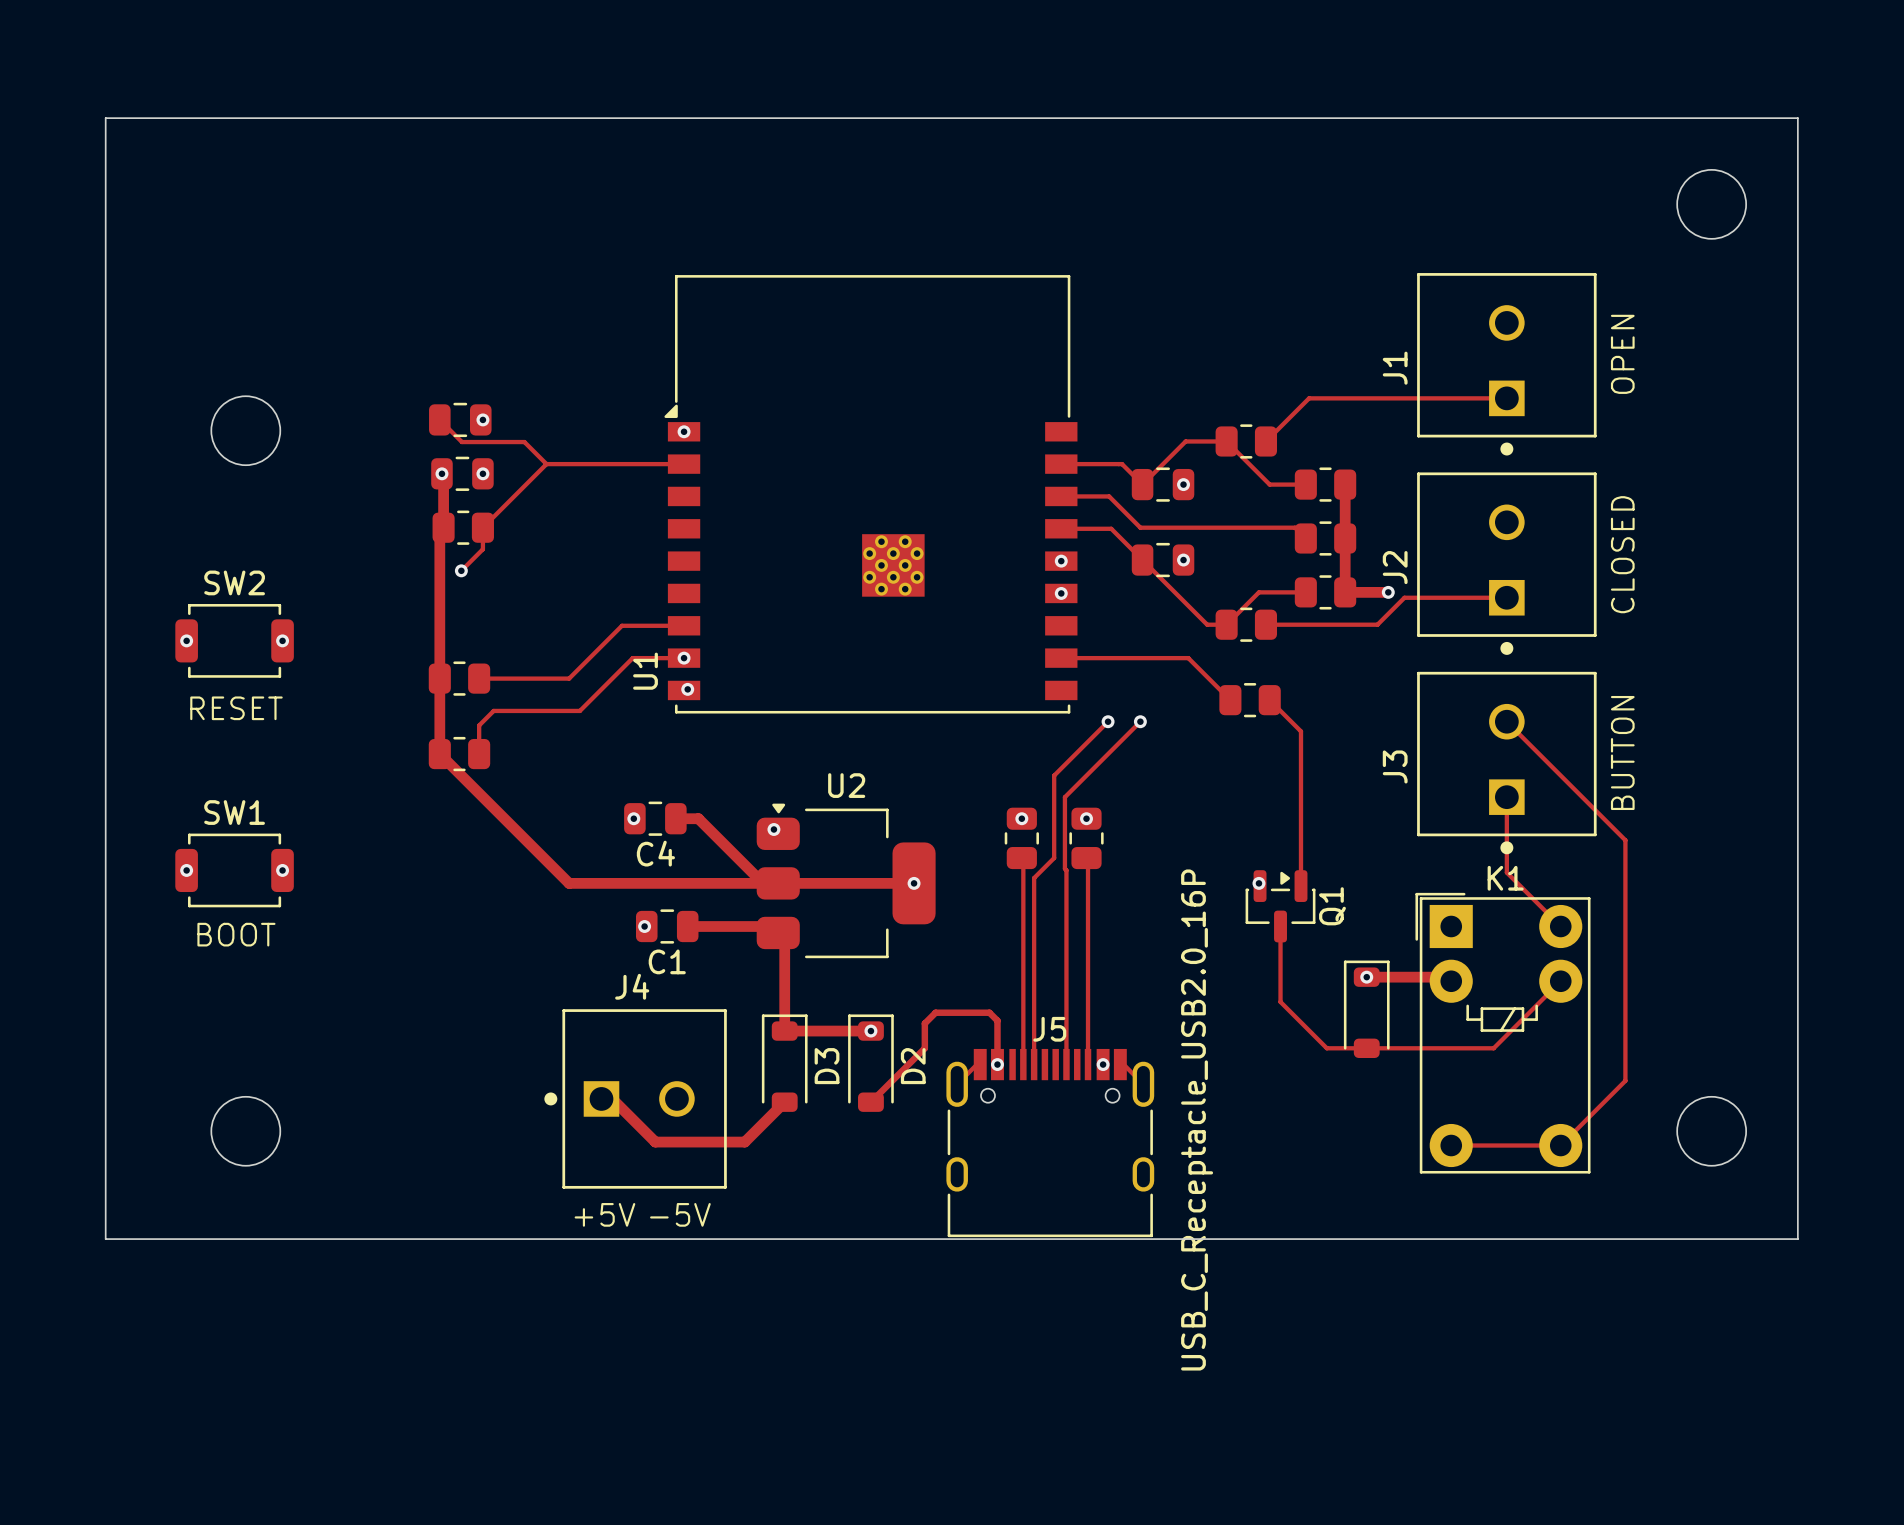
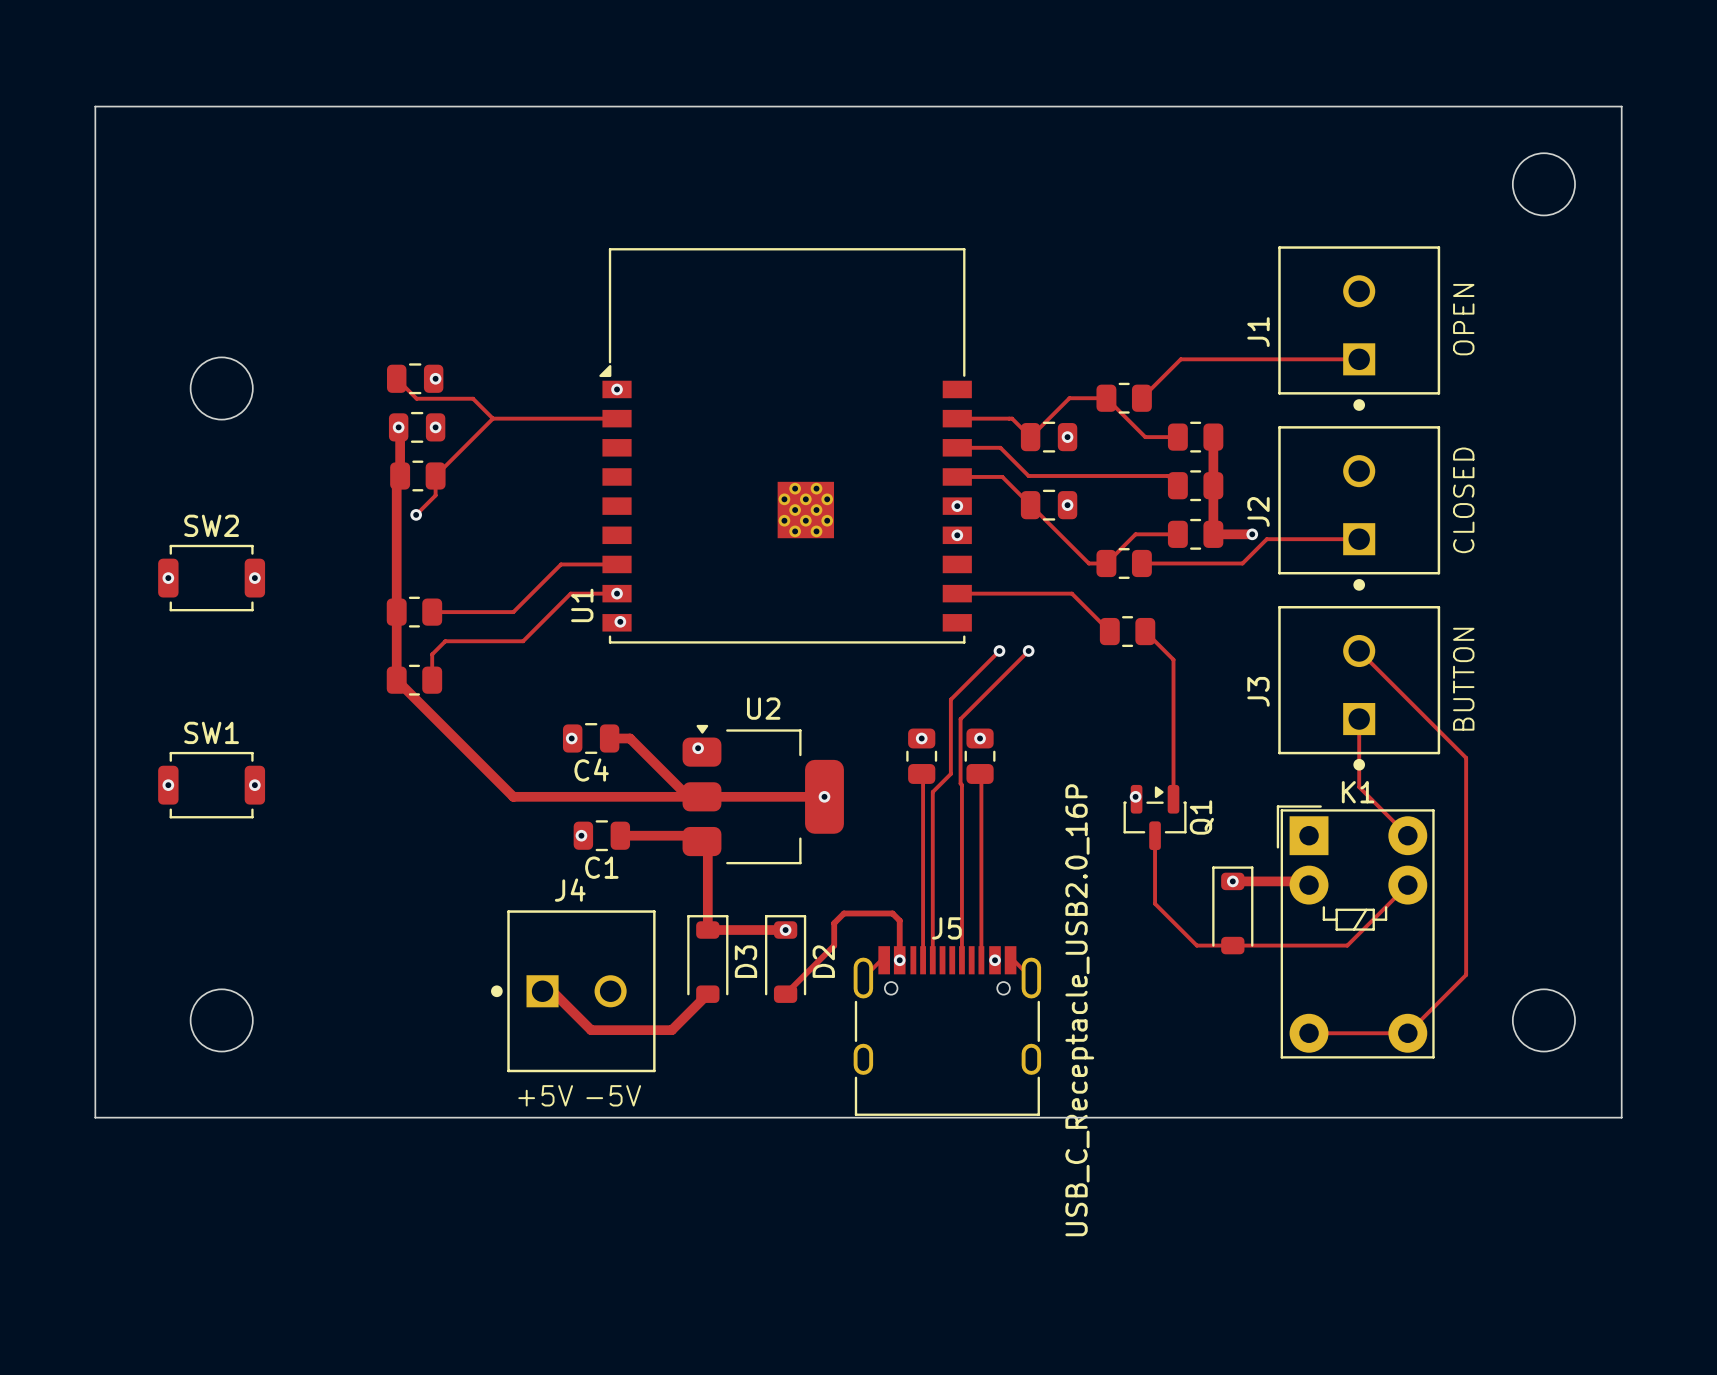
text: RESET (236, 708) -> none
text: BOOT (236, 934) -> none

